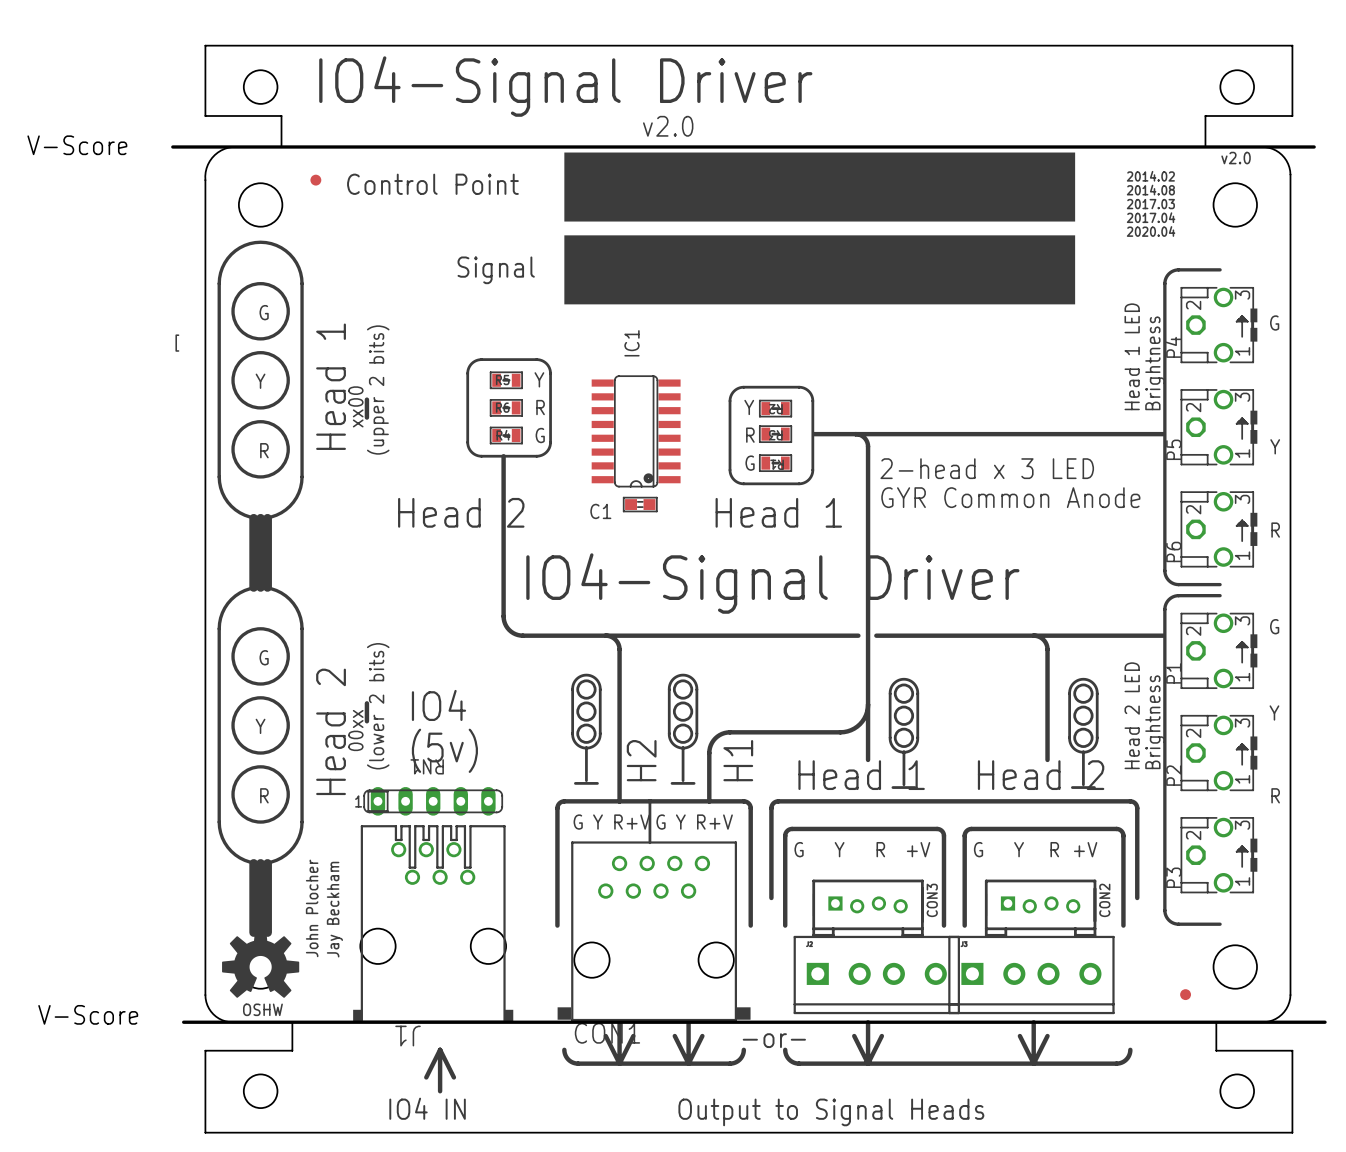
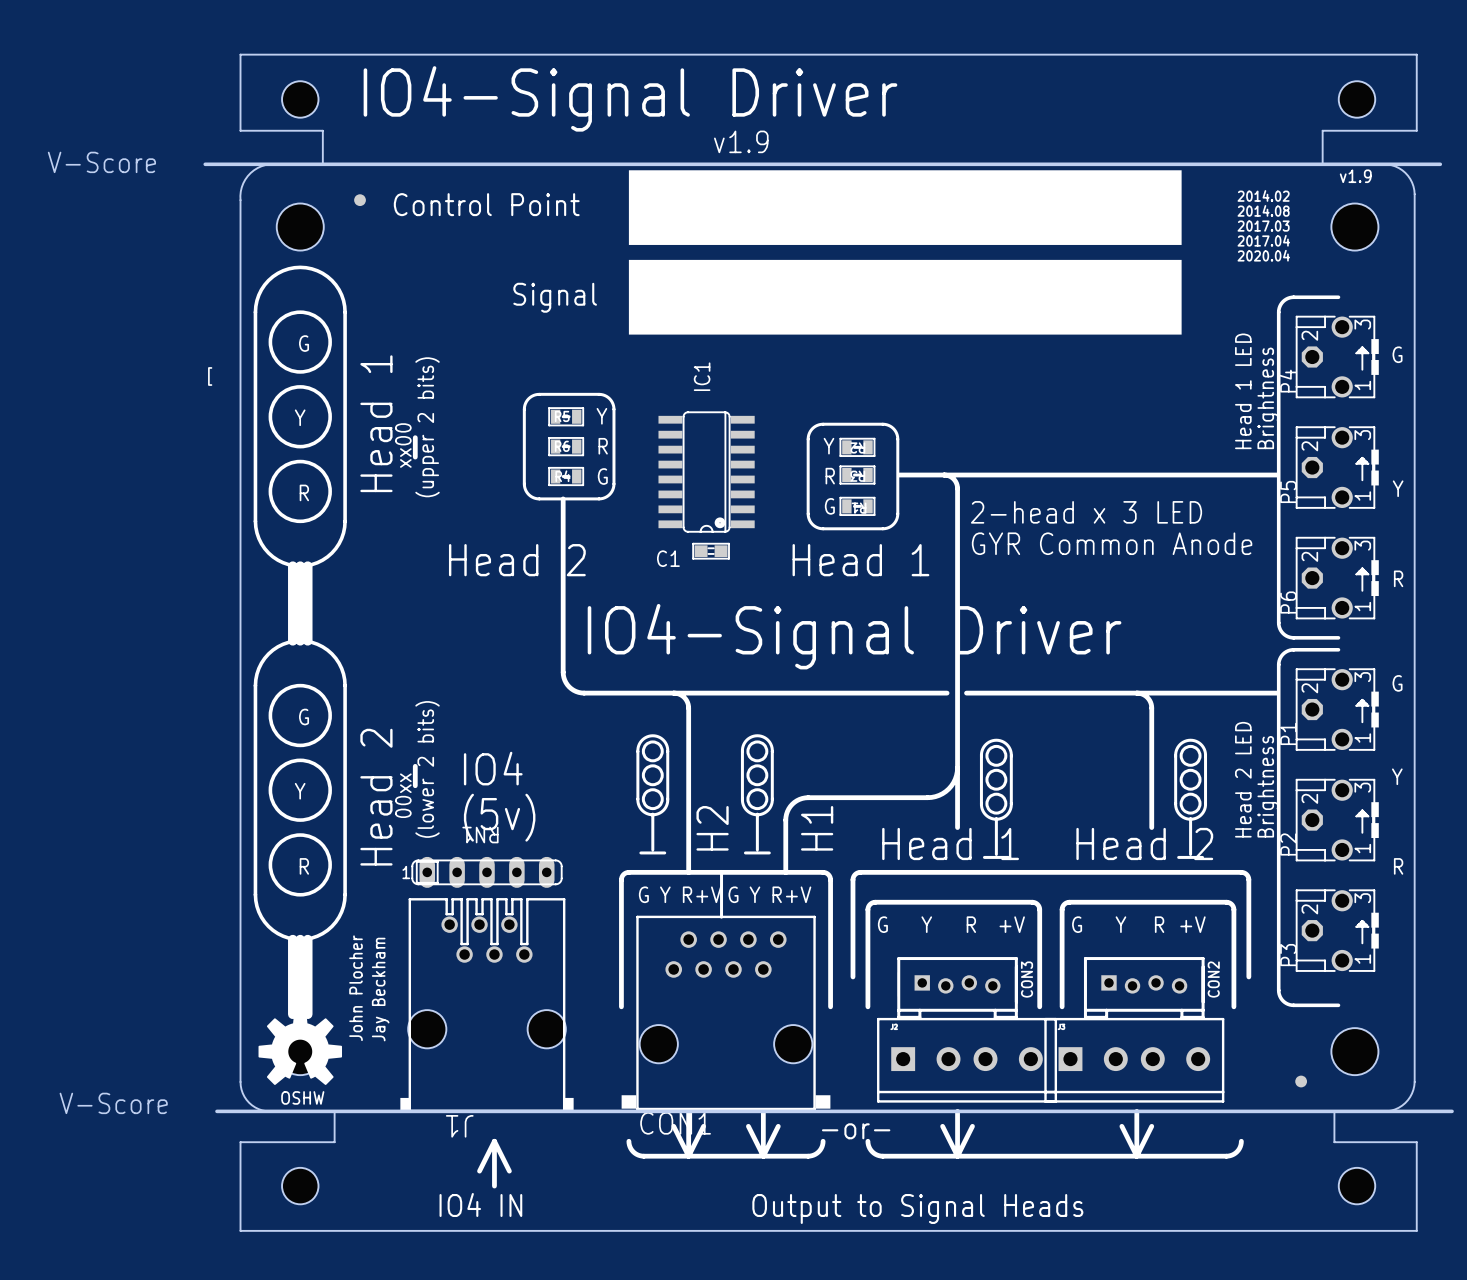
text: v2.0 (668, 126) -> v1.9 (741, 141)
text: v2.0 (1236, 158) -> v1.9 (1355, 176)

